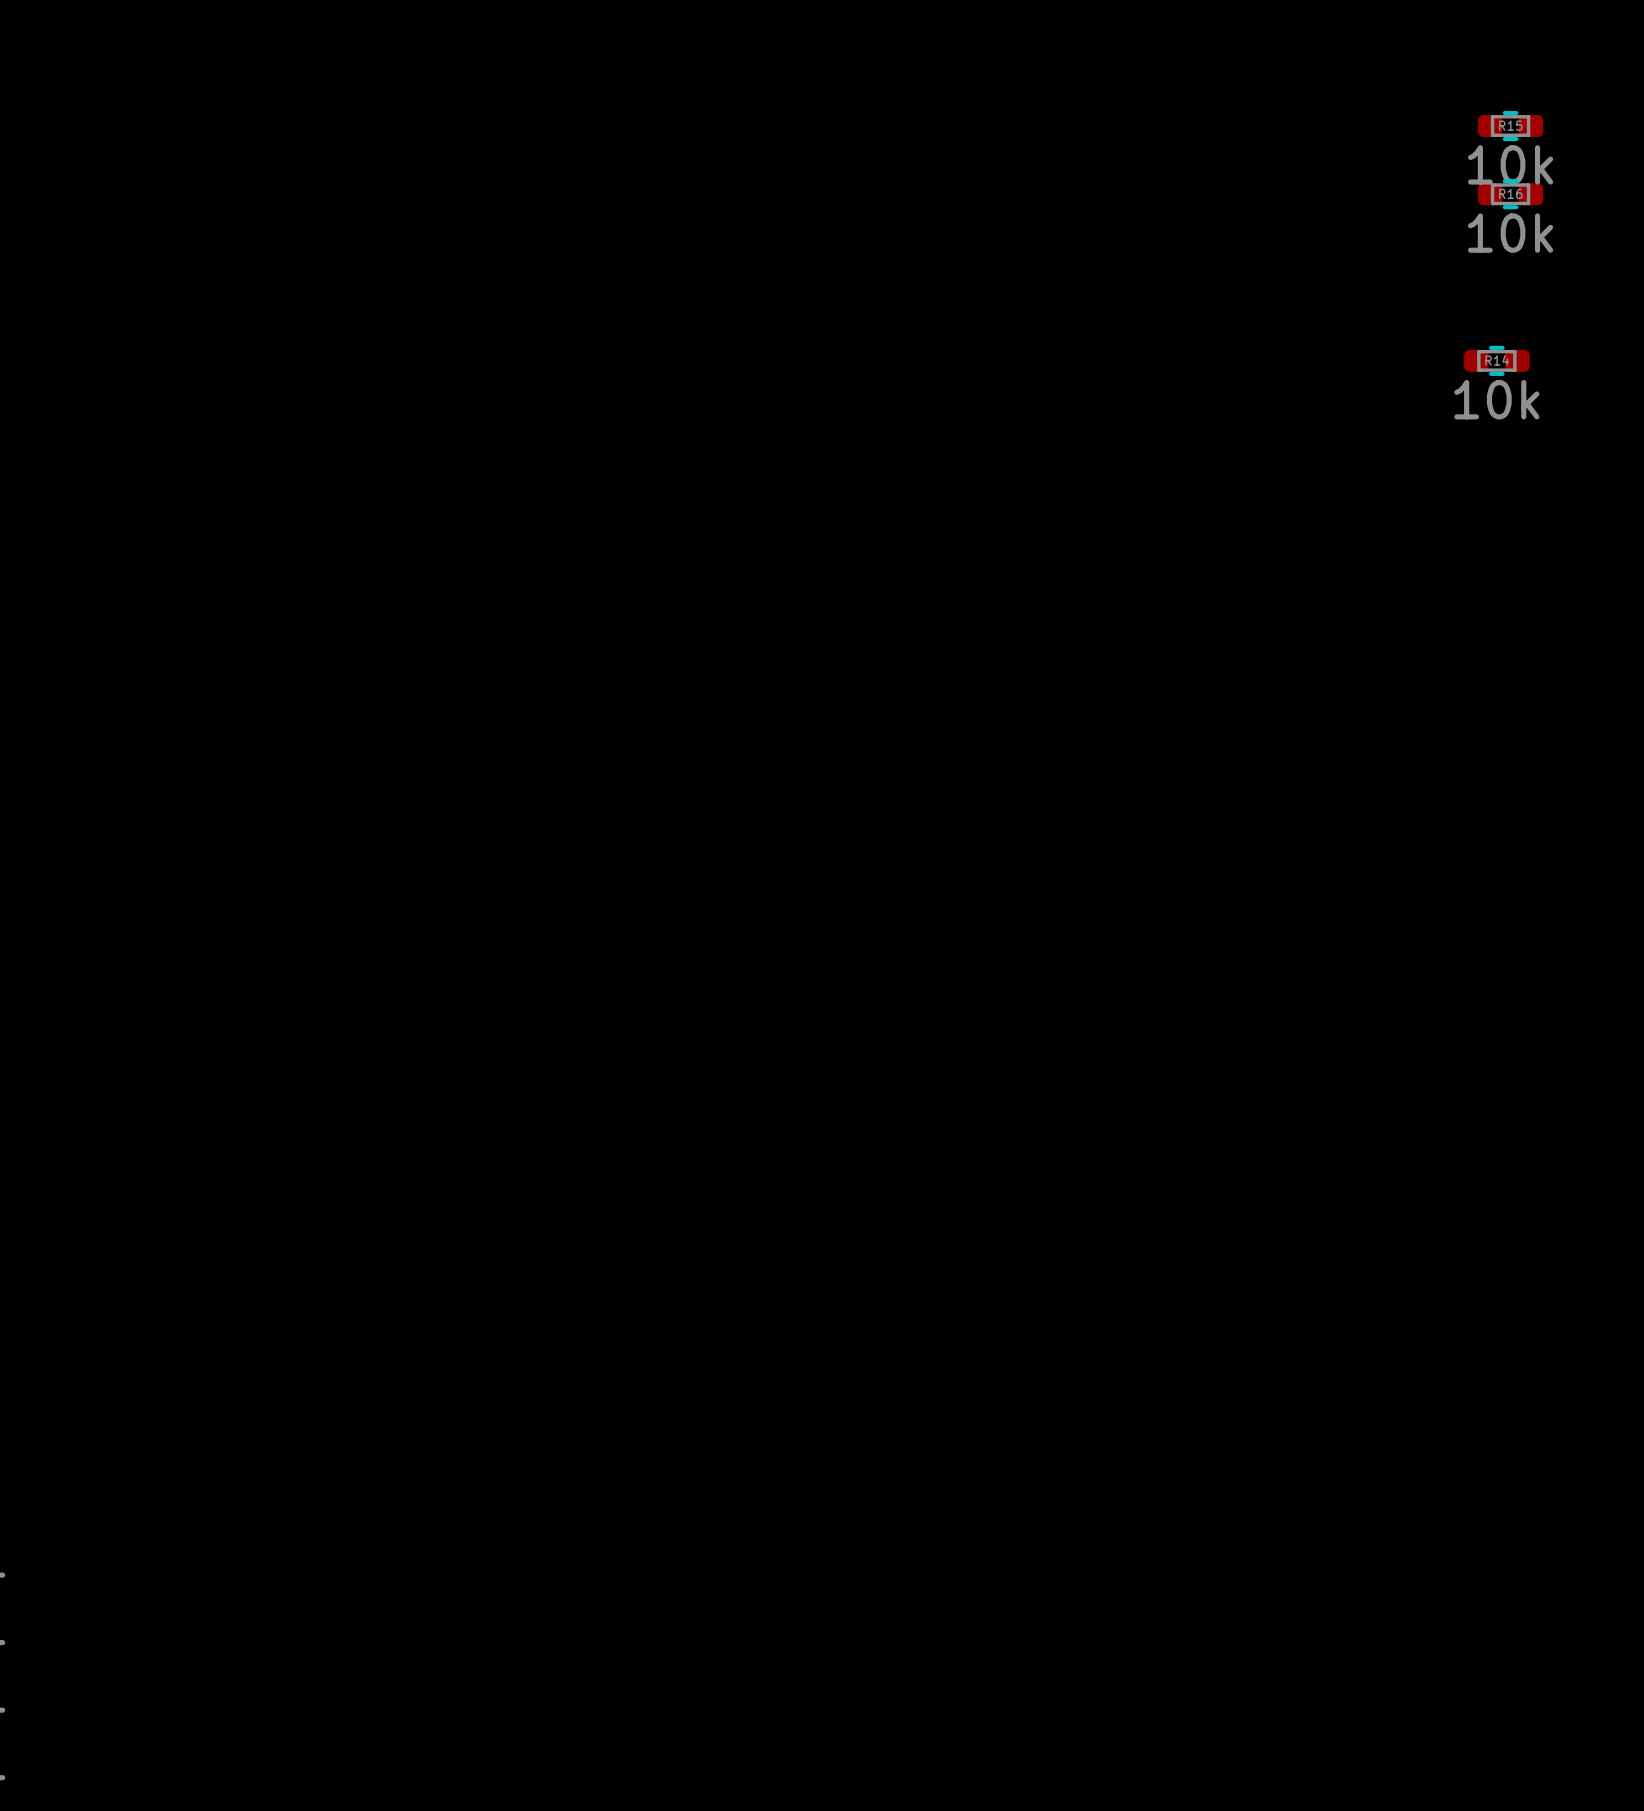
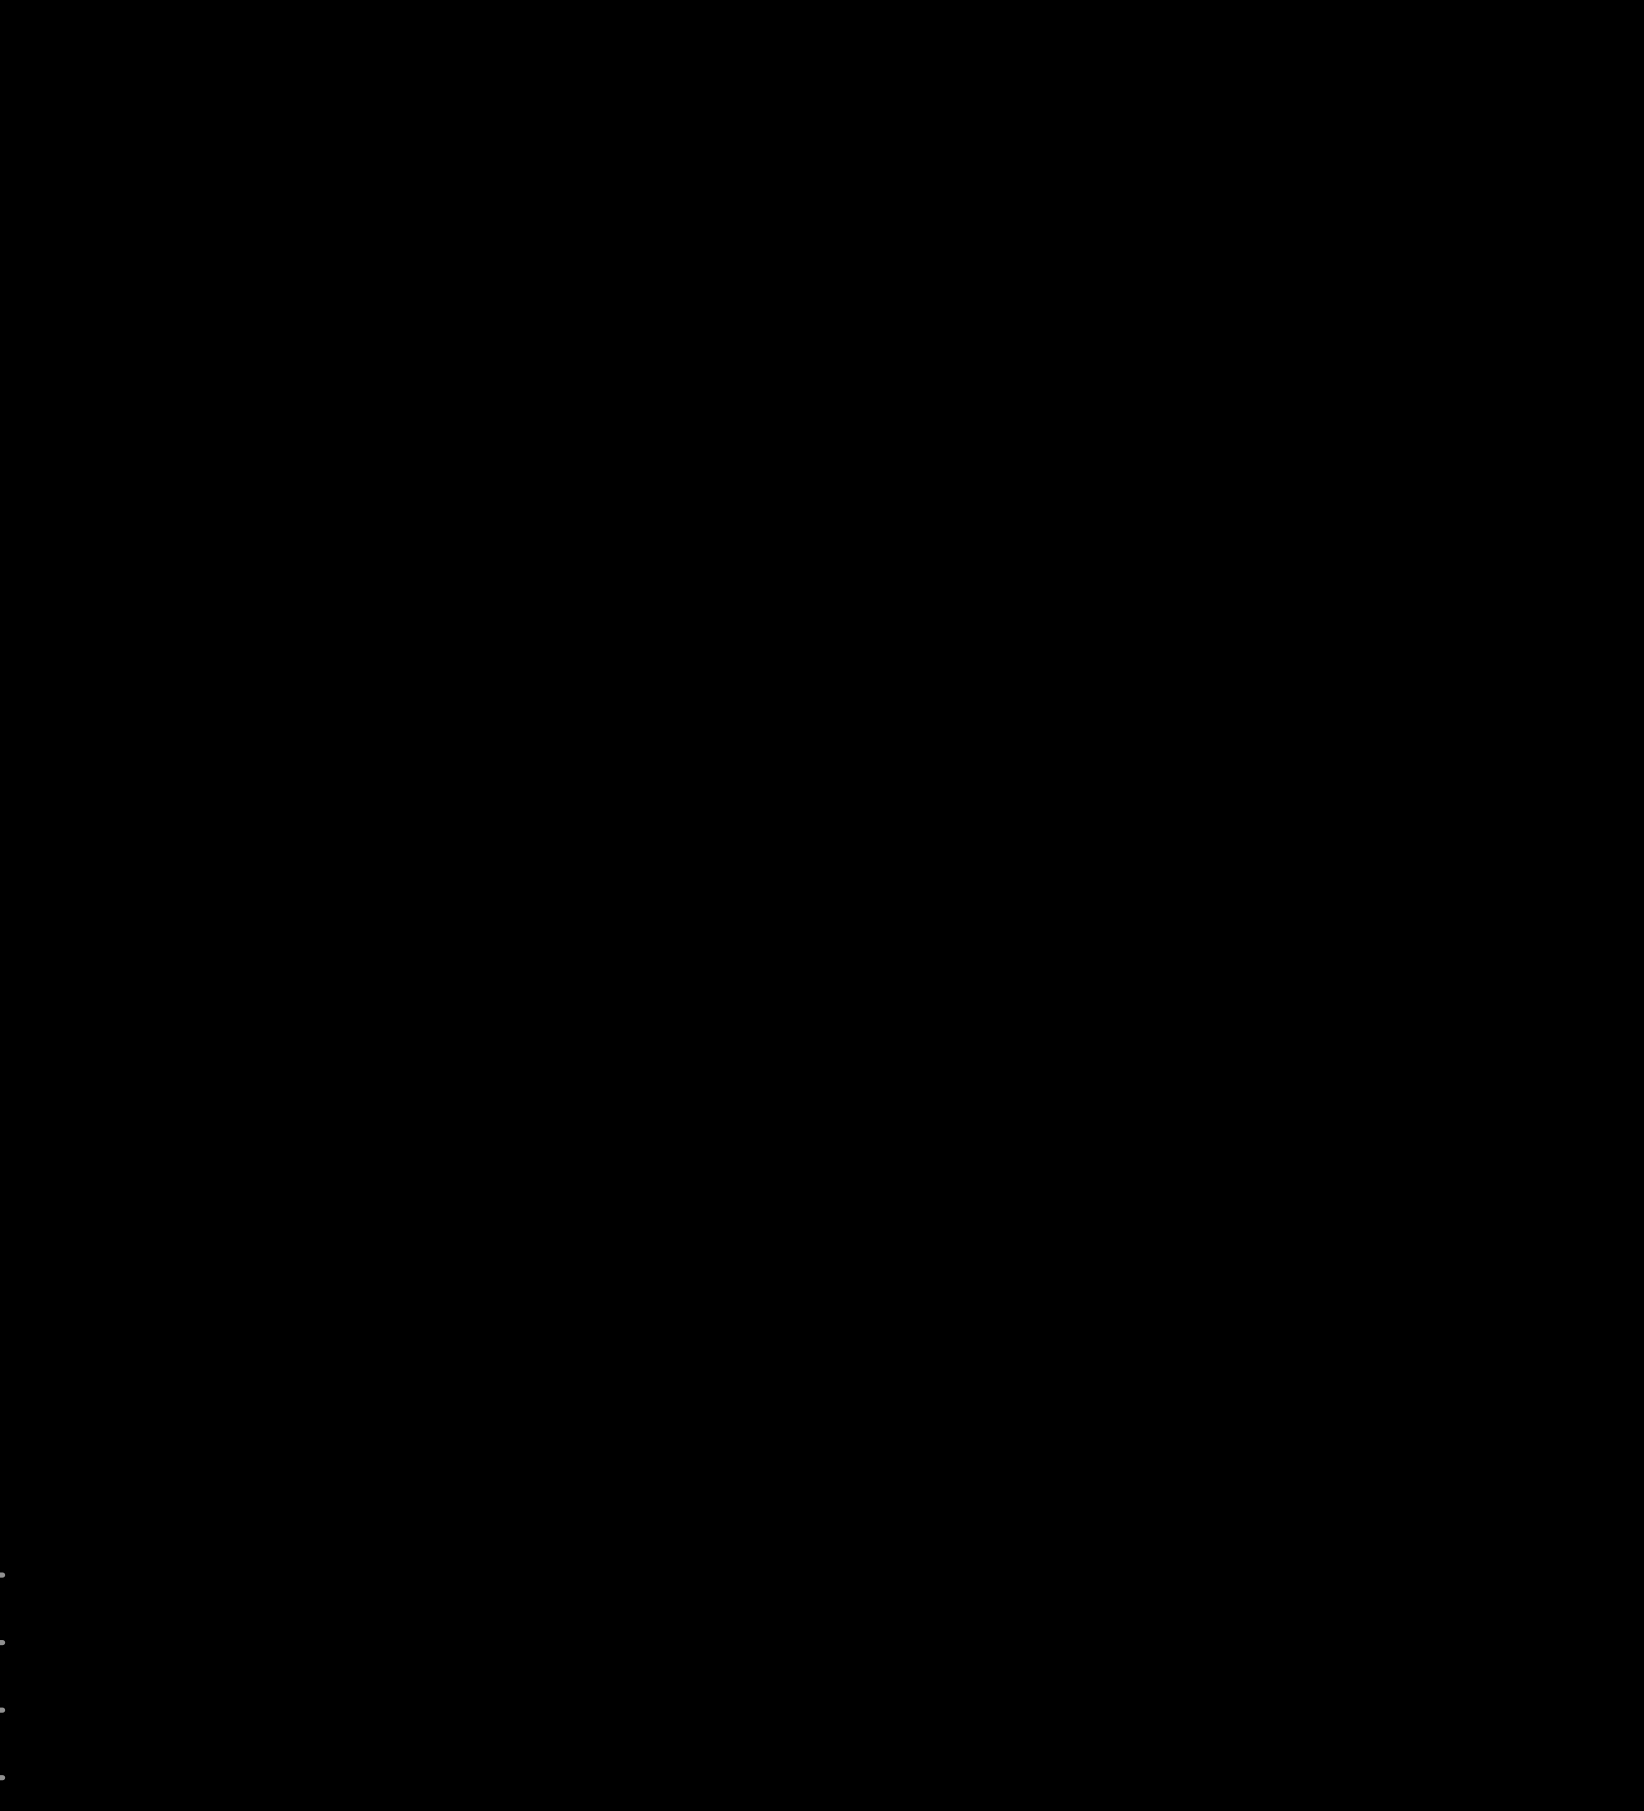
R15: 10k (1510, 126) -> none
R16: 10k (1510, 194) -> none
R14: 10k (1496, 360) -> none

